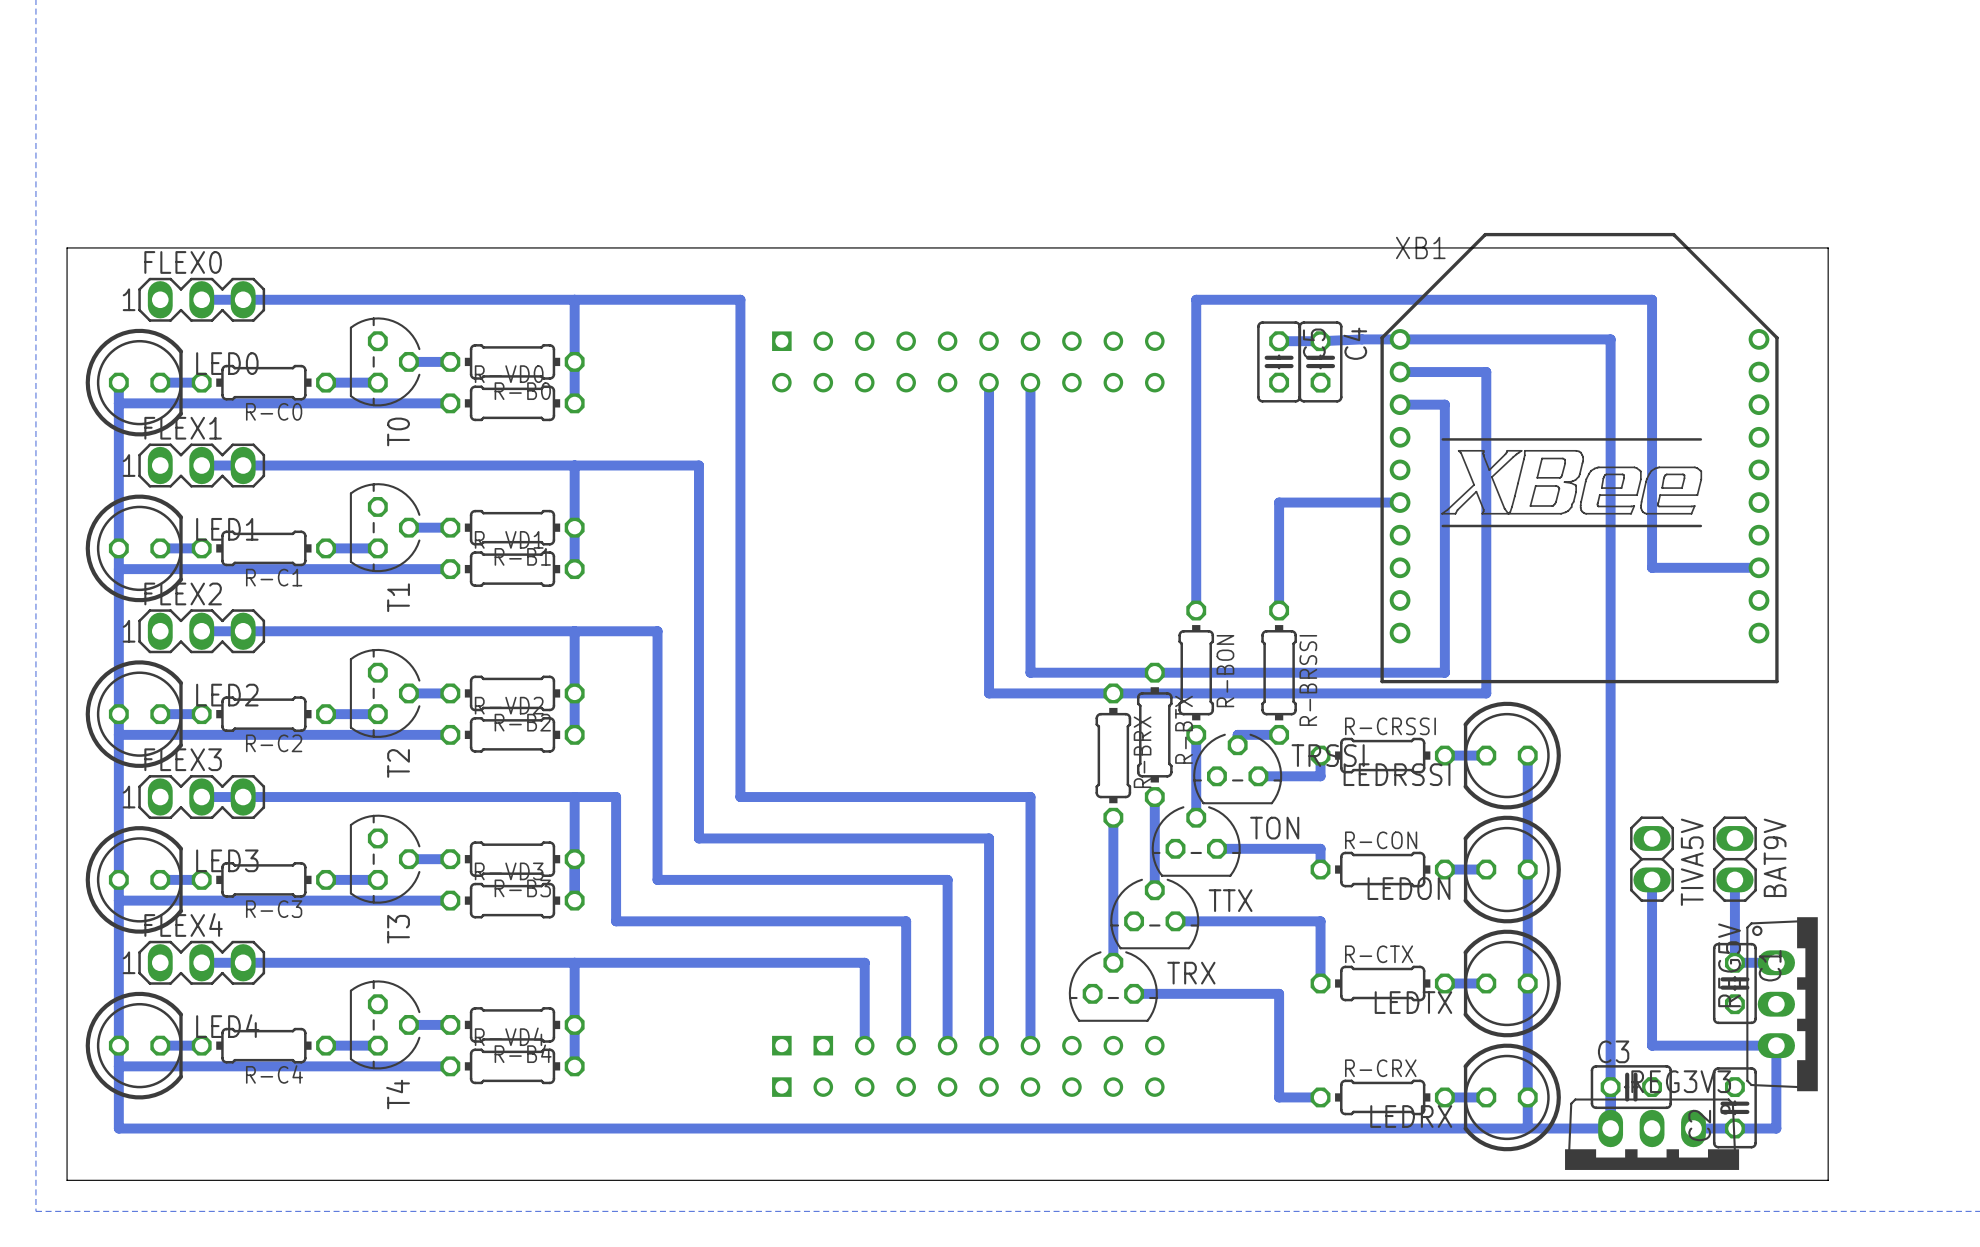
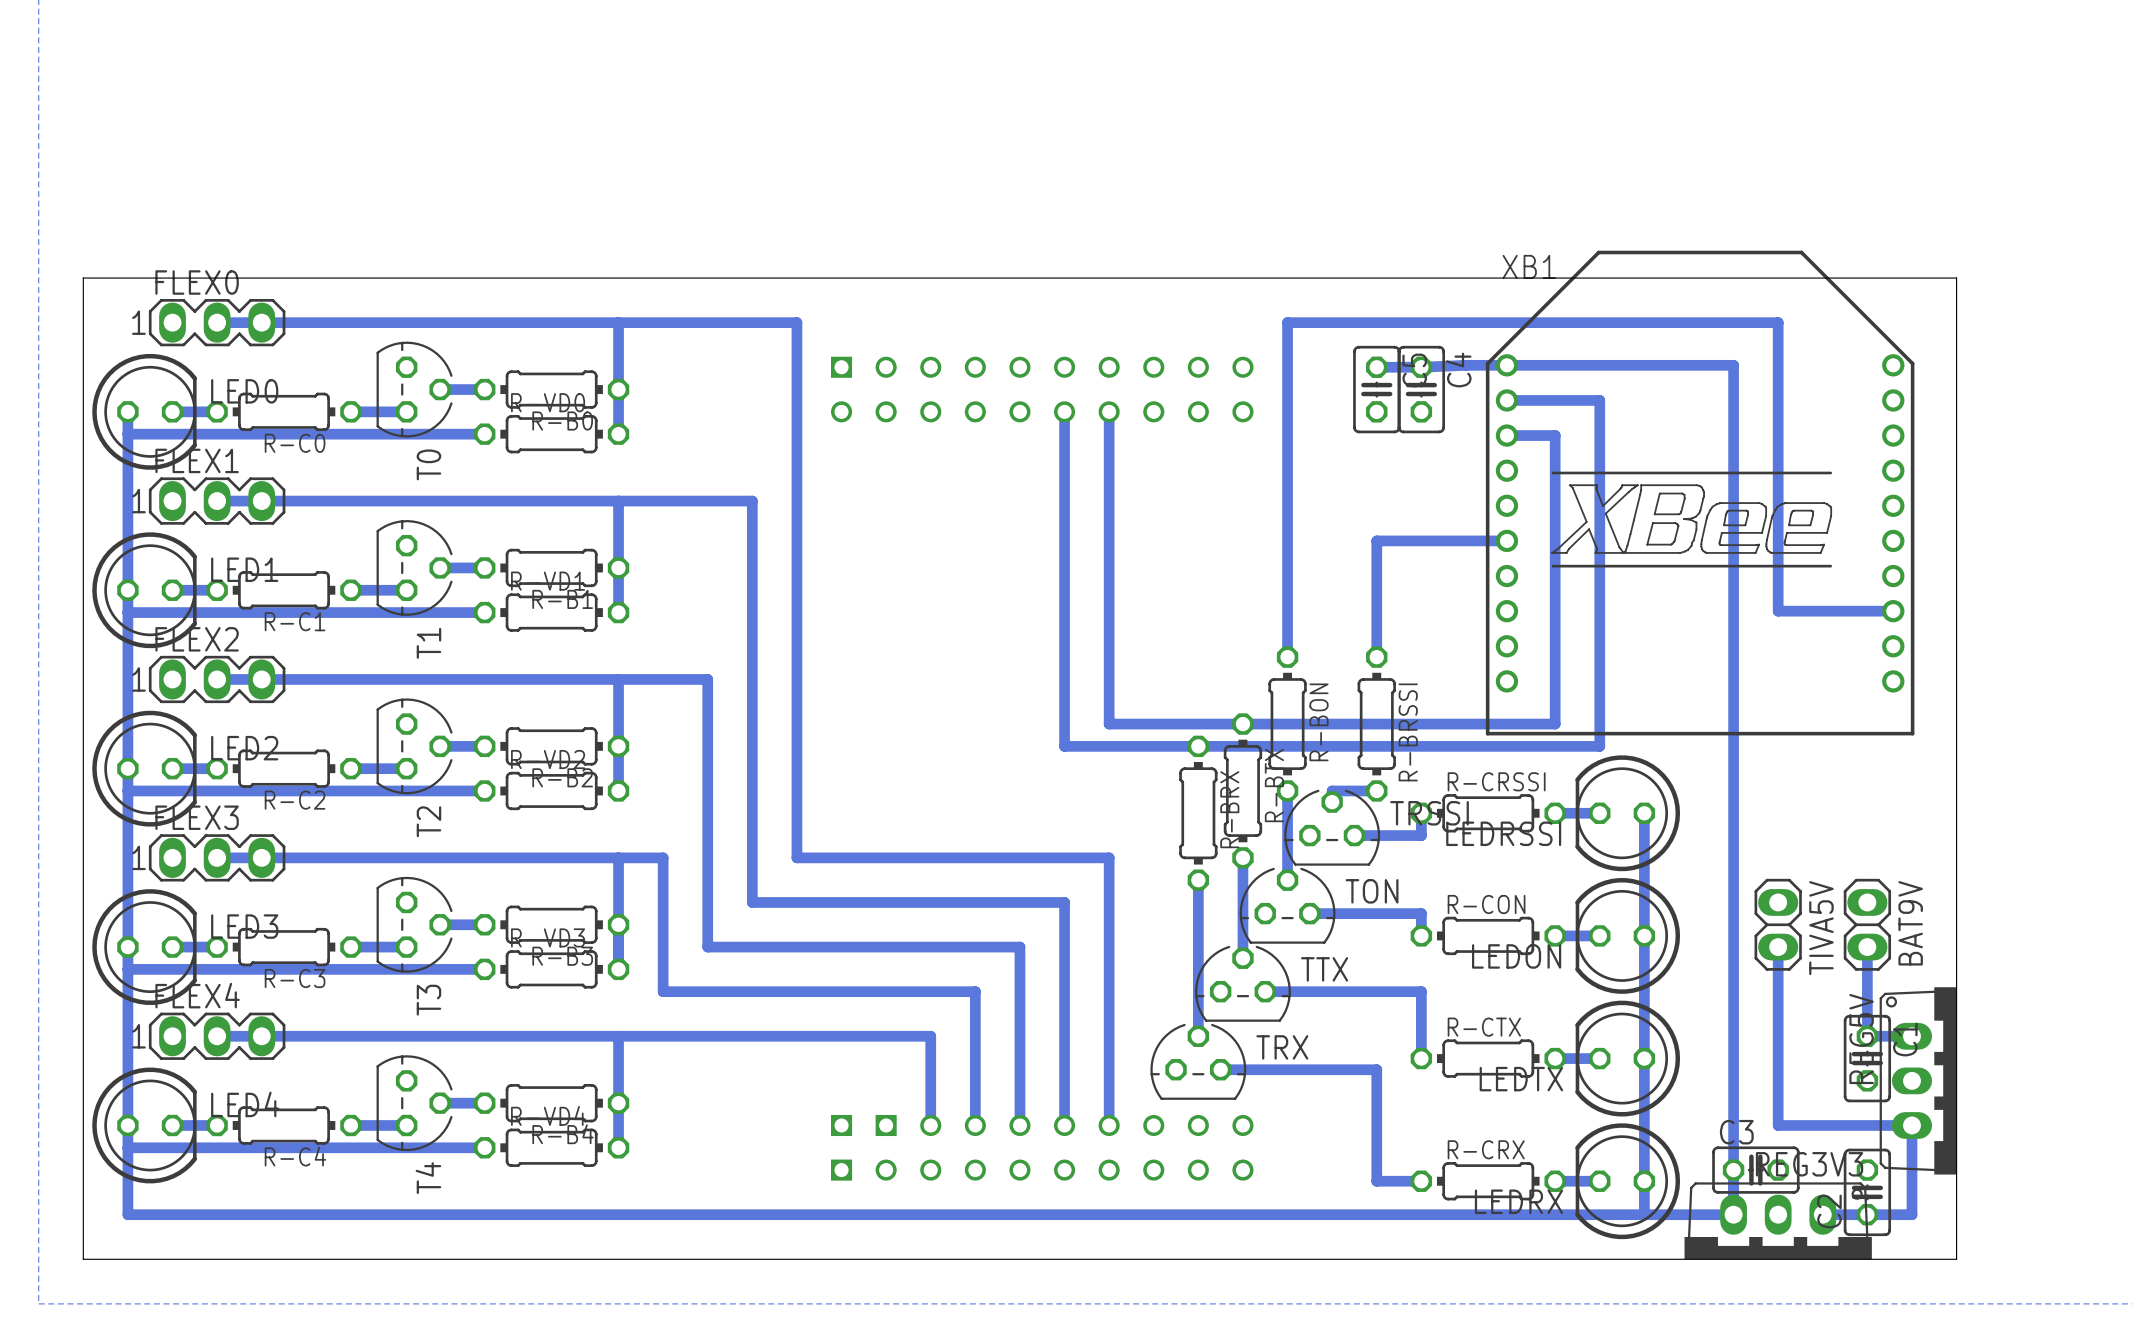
board edge: (67, 247) (1828, 247) (1828, 1180) (67, 1180) (67, 247) -> (83, 278) (83, 1259) (1956, 1259) (1956, 278) (83, 278)

